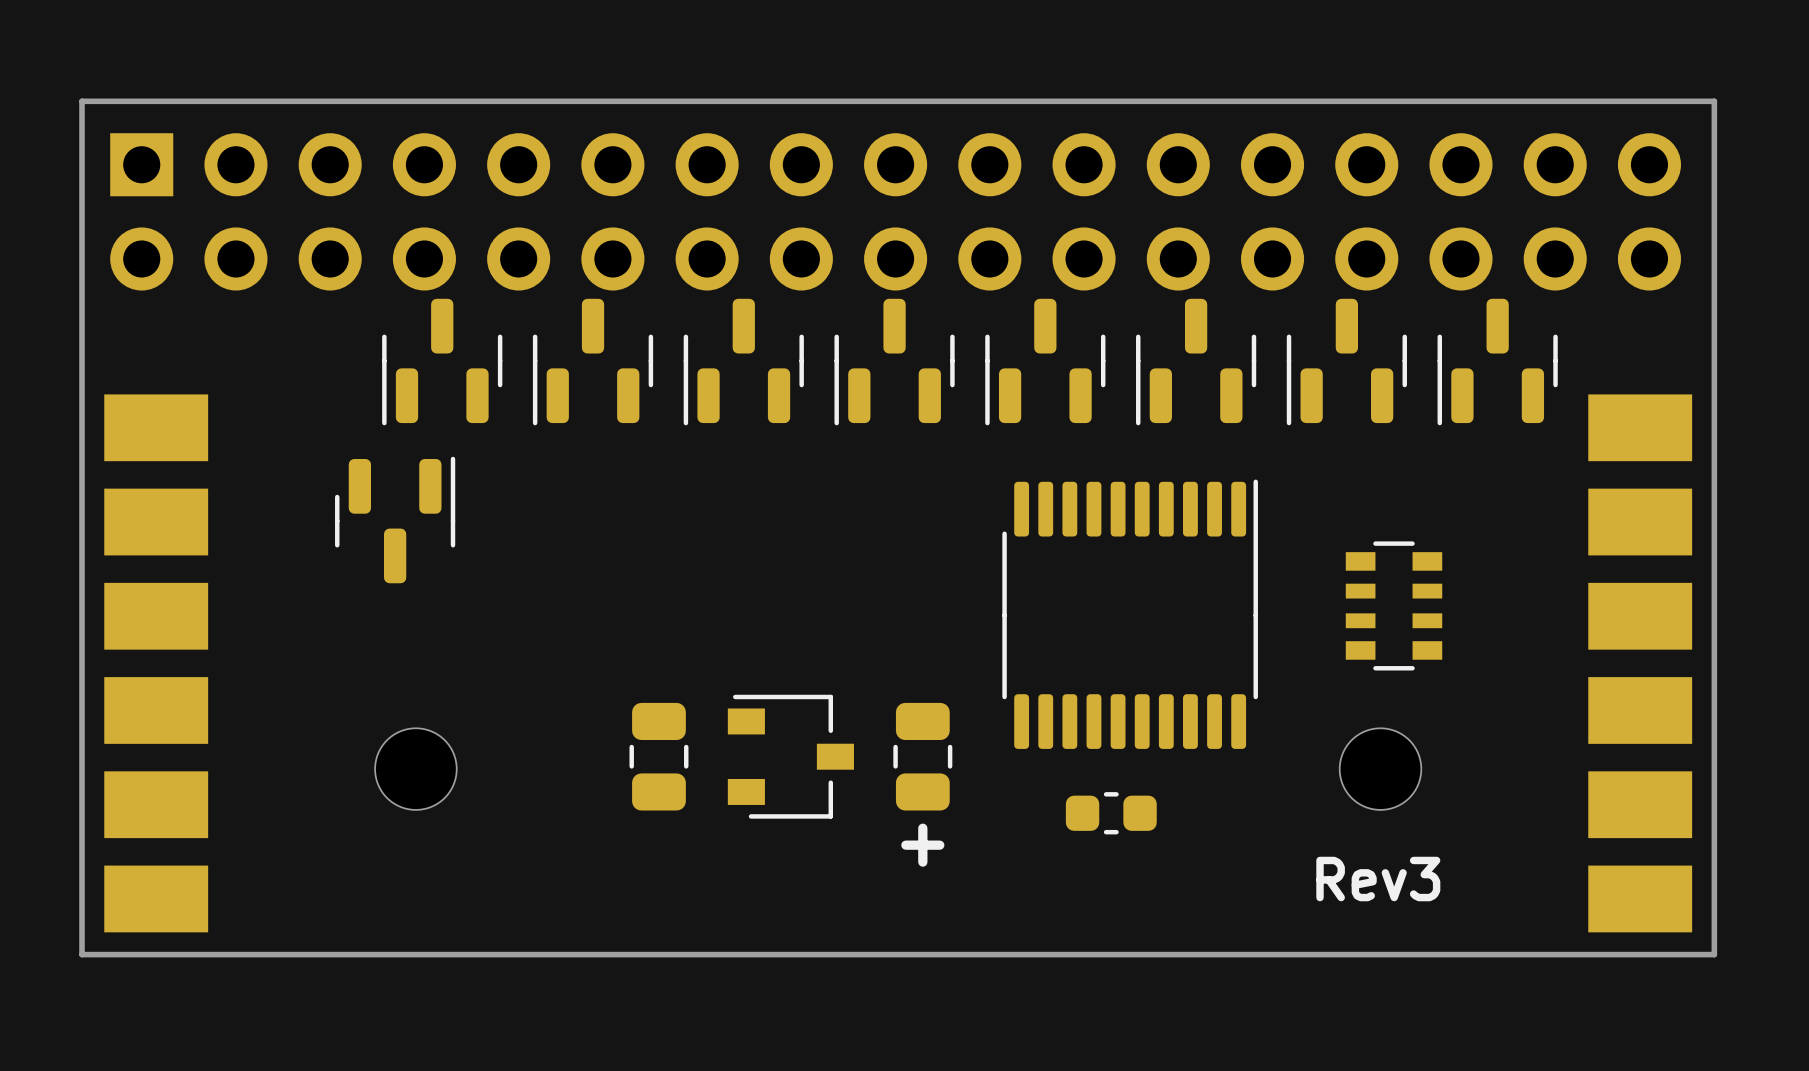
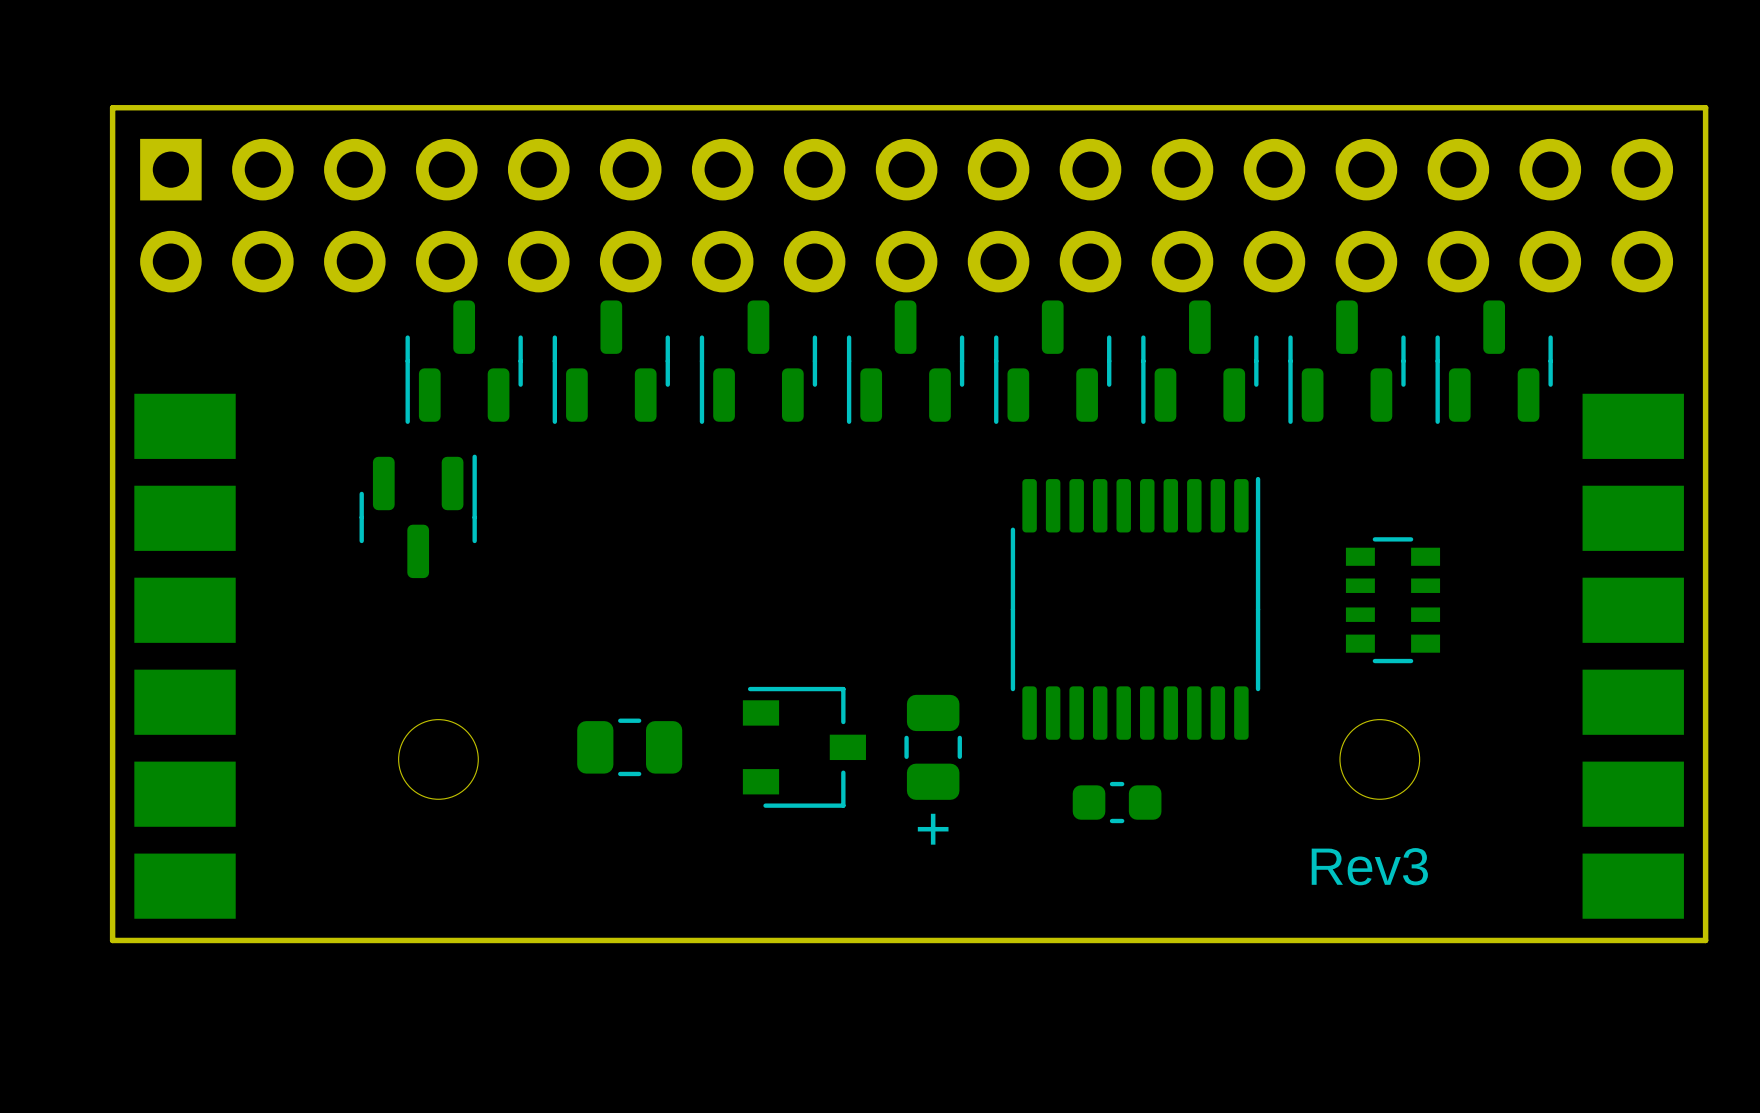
part rotation: 0° (658, 756) -> 90° clockwise (629, 747)

